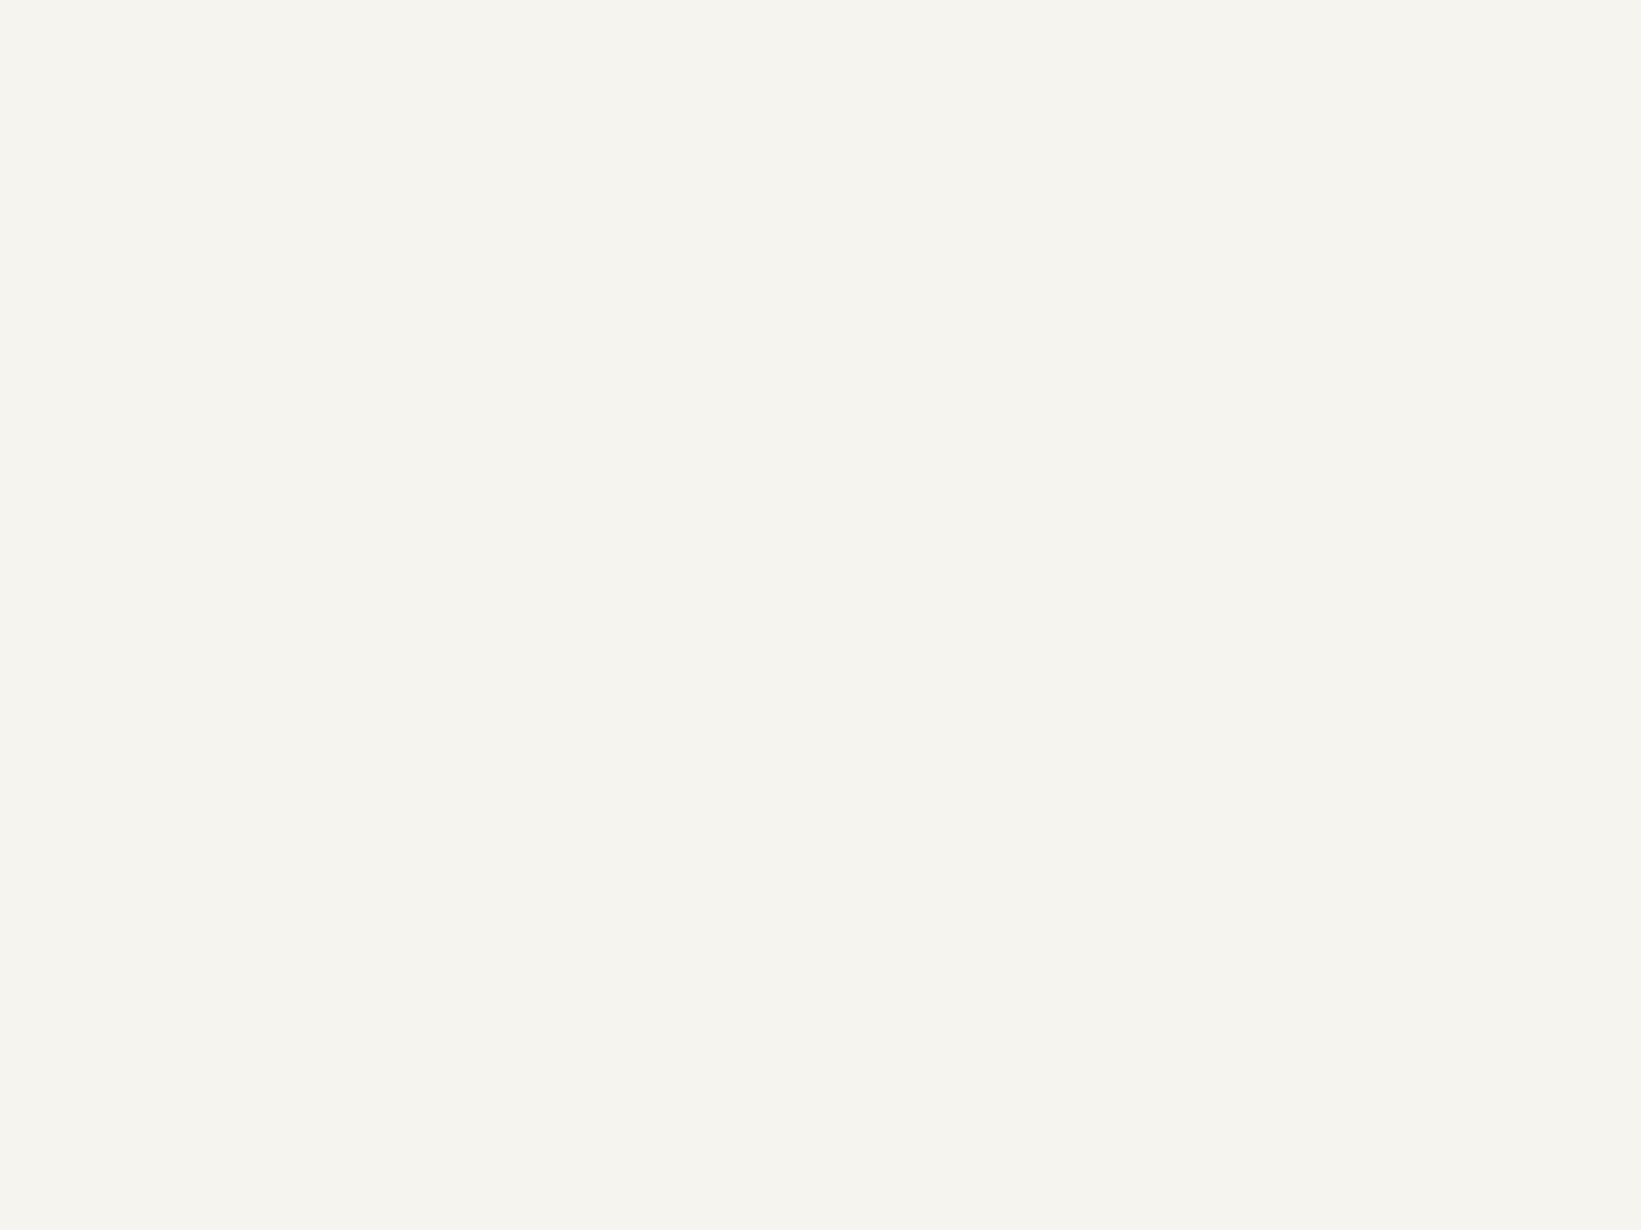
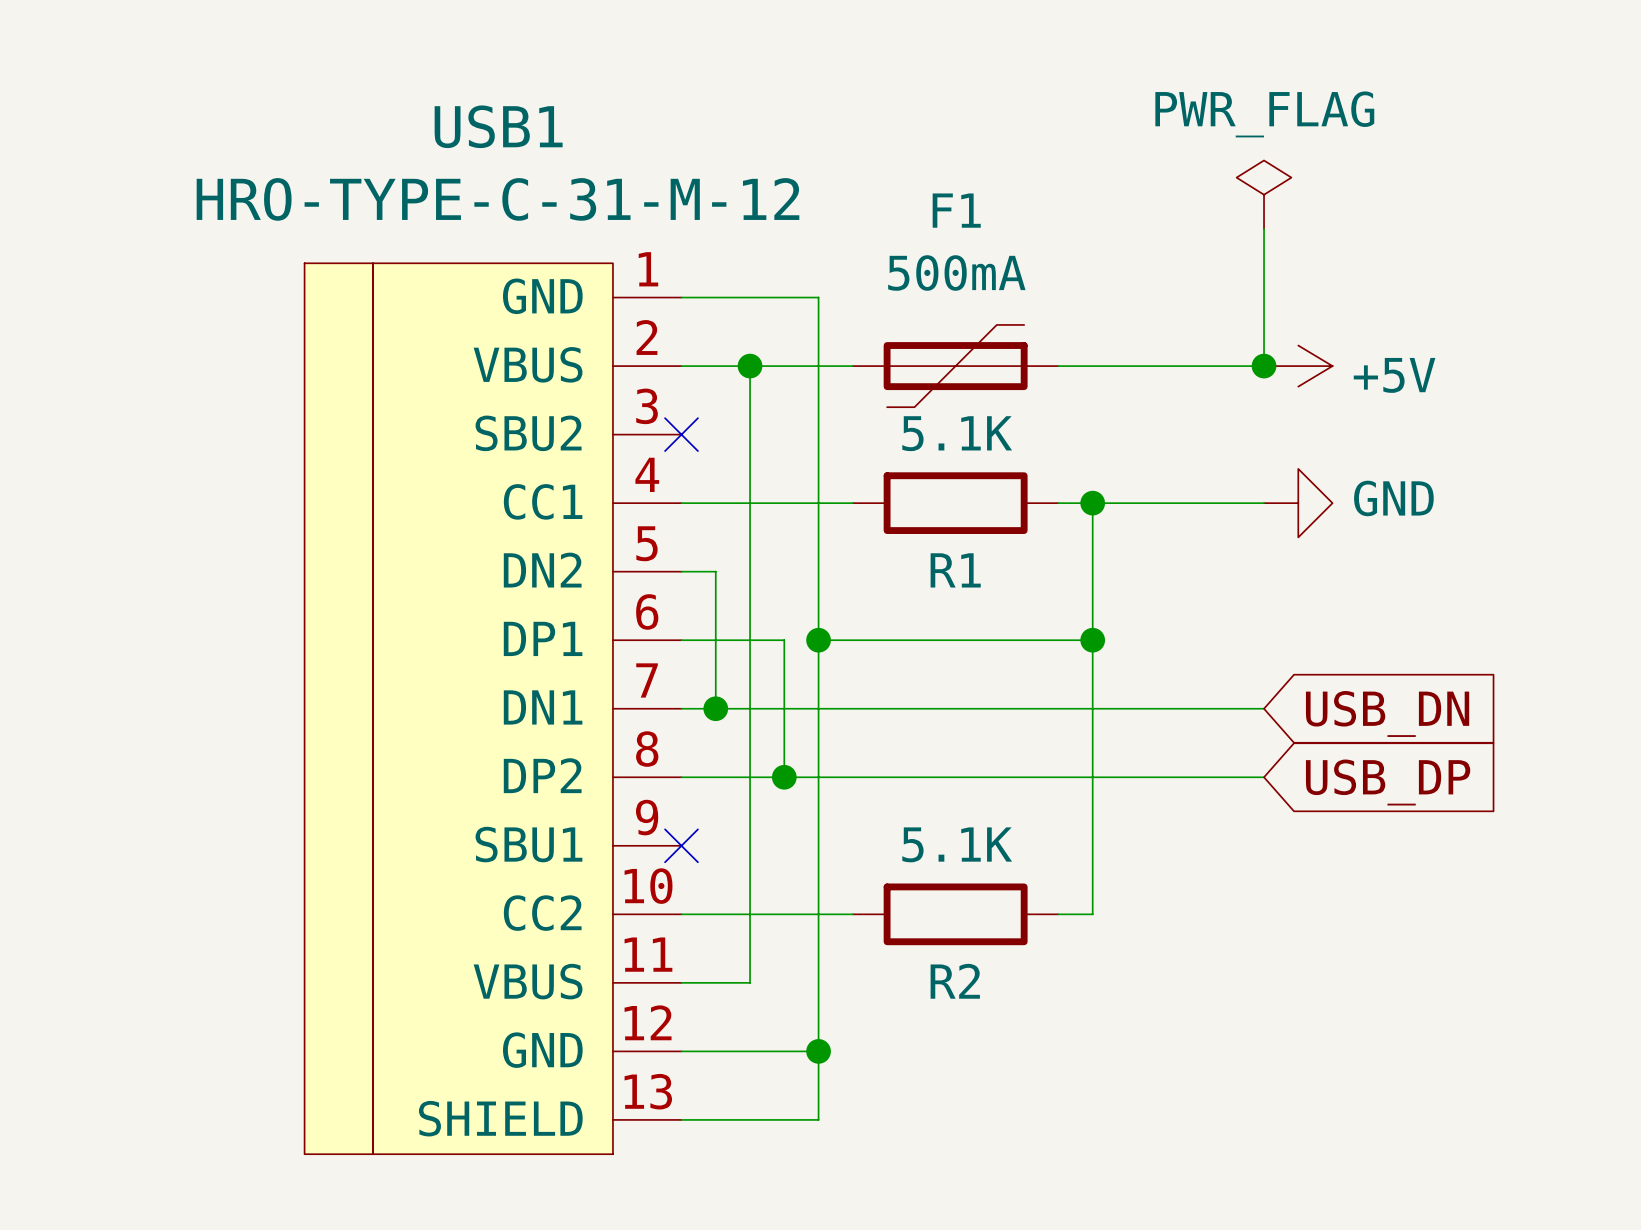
power symbol: none -> PWR_FLAG (1264, 194)
wire: none -> (1264, 229) (1264, 366) (1058, 366)
wire: none -> (681, 297) (818, 297) (818, 1119) (681, 1119)
wire: none -> (681, 366) (852, 366)
wire: none -> (750, 366) (750, 982) (681, 982)
junction: none -> (750, 366)
F1: none -> 500mA (955, 366)
junction: none -> (1264, 366)
power symbol: none -> +5V (1298, 366)
no-connect mark: none -> (681, 434)
wire: none -> (681, 503) (852, 503)
R1: none -> 5.1K (955, 503)
wire: none -> (1058, 503) (1264, 503)
wire: none -> (1092, 503) (1092, 914) (1058, 914)
junction: none -> (1092, 503)
power symbol: none -> GND (1298, 503)
wire: none -> (681, 571) (715, 571) (715, 708)
wire: none -> (681, 640) (784, 640) (784, 777)
wire: none -> (818, 640) (1092, 640)
junction: none -> (818, 640)
junction: none -> (1092, 640)
USB1: none -> HRO-TYPE-C-31-M-12 (493, 708)
wire: none -> (681, 708) (1264, 708)
junction: none -> (715, 708)
global label: none -> USB_DN (1387, 713)
wire: none -> (681, 777) (1264, 777)
junction: none -> (784, 777)
global label: none -> USB_DP (1388, 782)
no-connect mark: none -> (681, 845)
wire: none -> (681, 914) (852, 914)
R2: none -> 5.1K (955, 914)
wire: none -> (681, 1051) (818, 1051)
junction: none -> (818, 1051)

